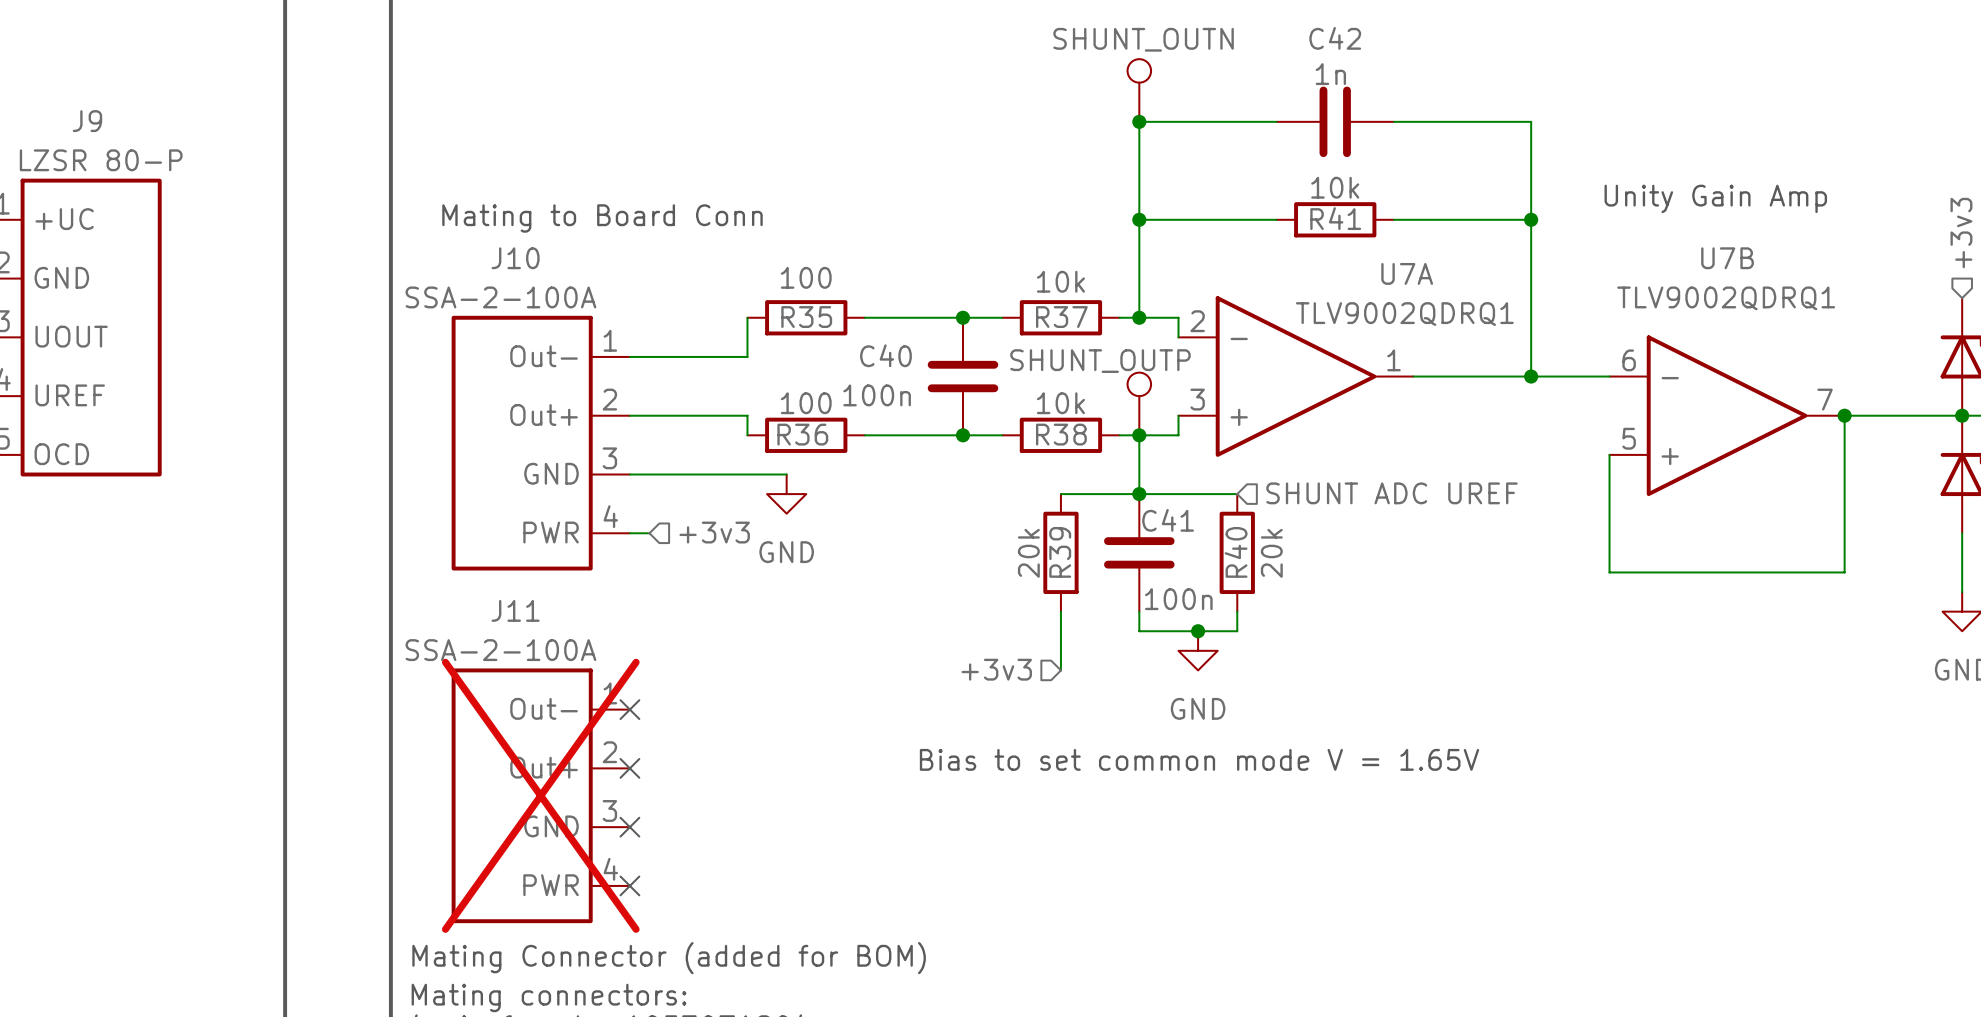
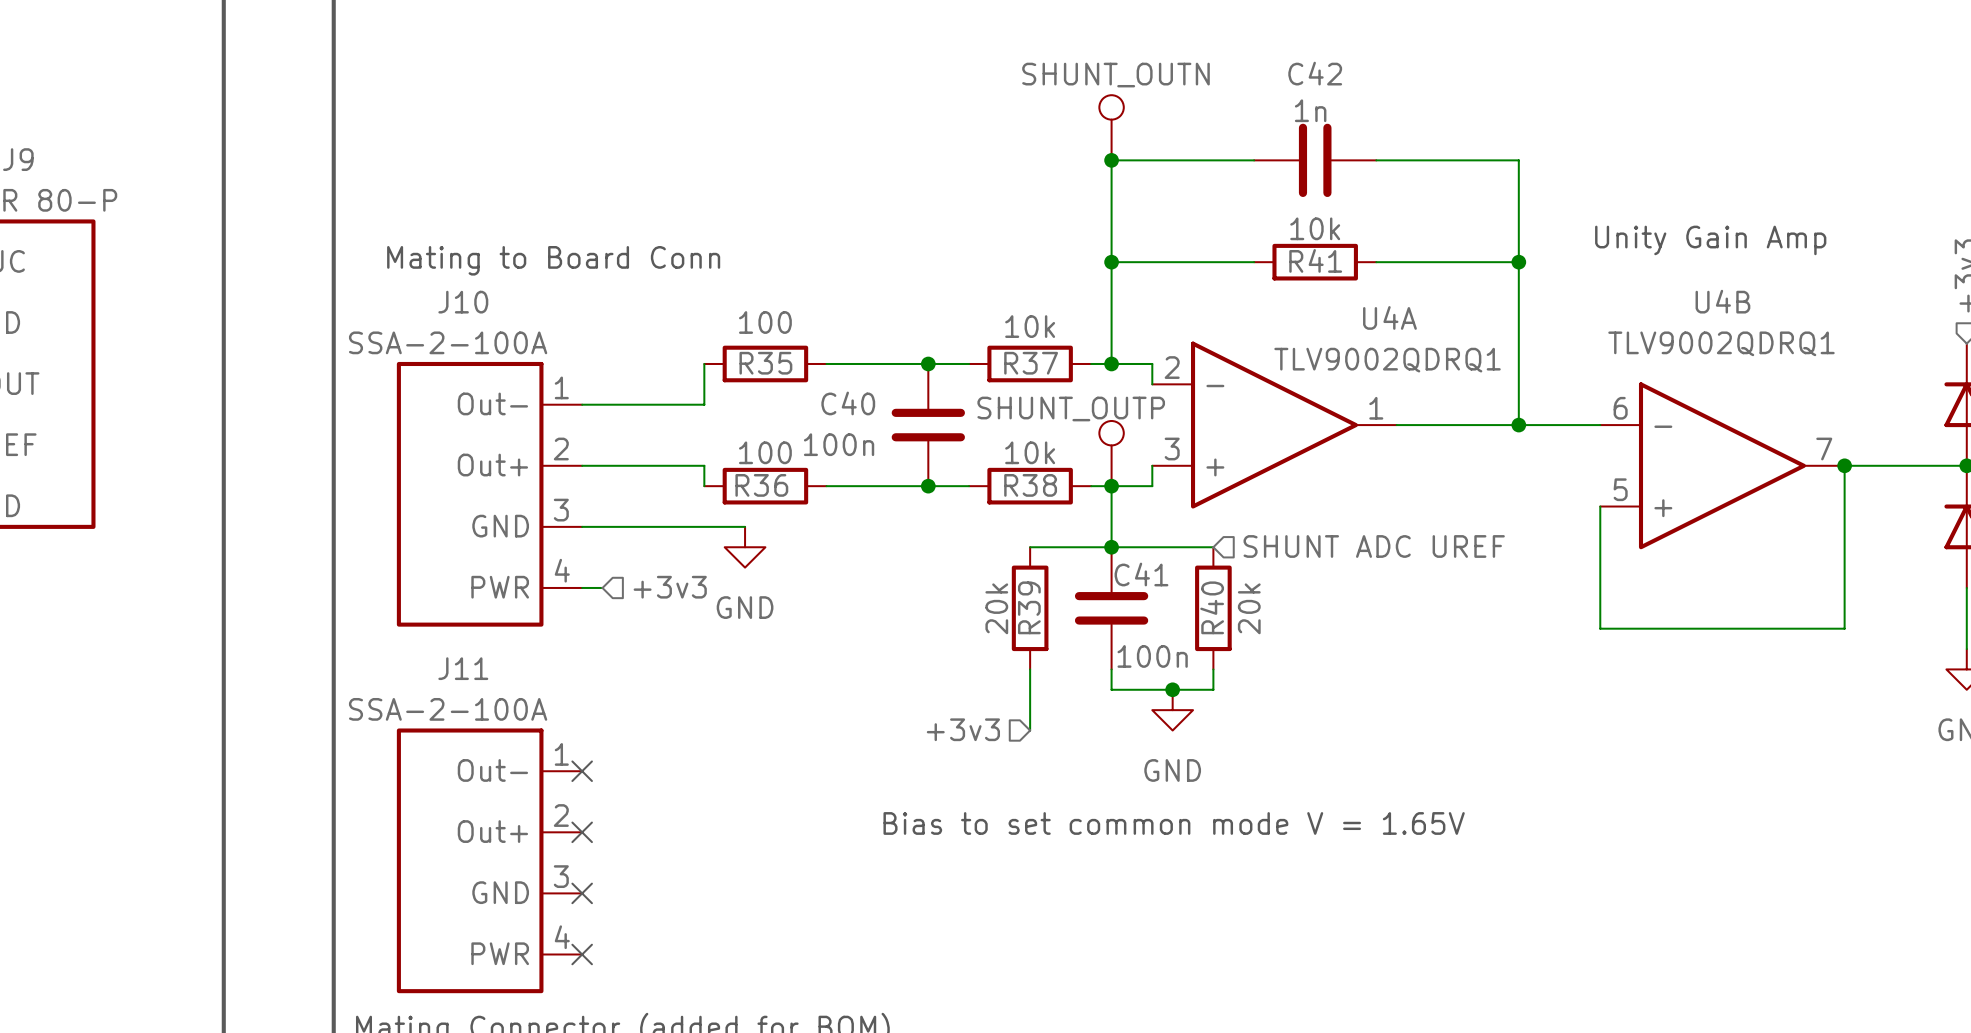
U7B name: U7B (1727, 258) -> U4B (1722, 301)
U7A name: U7A (1407, 273) -> U4A (1389, 317)
J11 do-not-place cross: (540, 795) -> none

